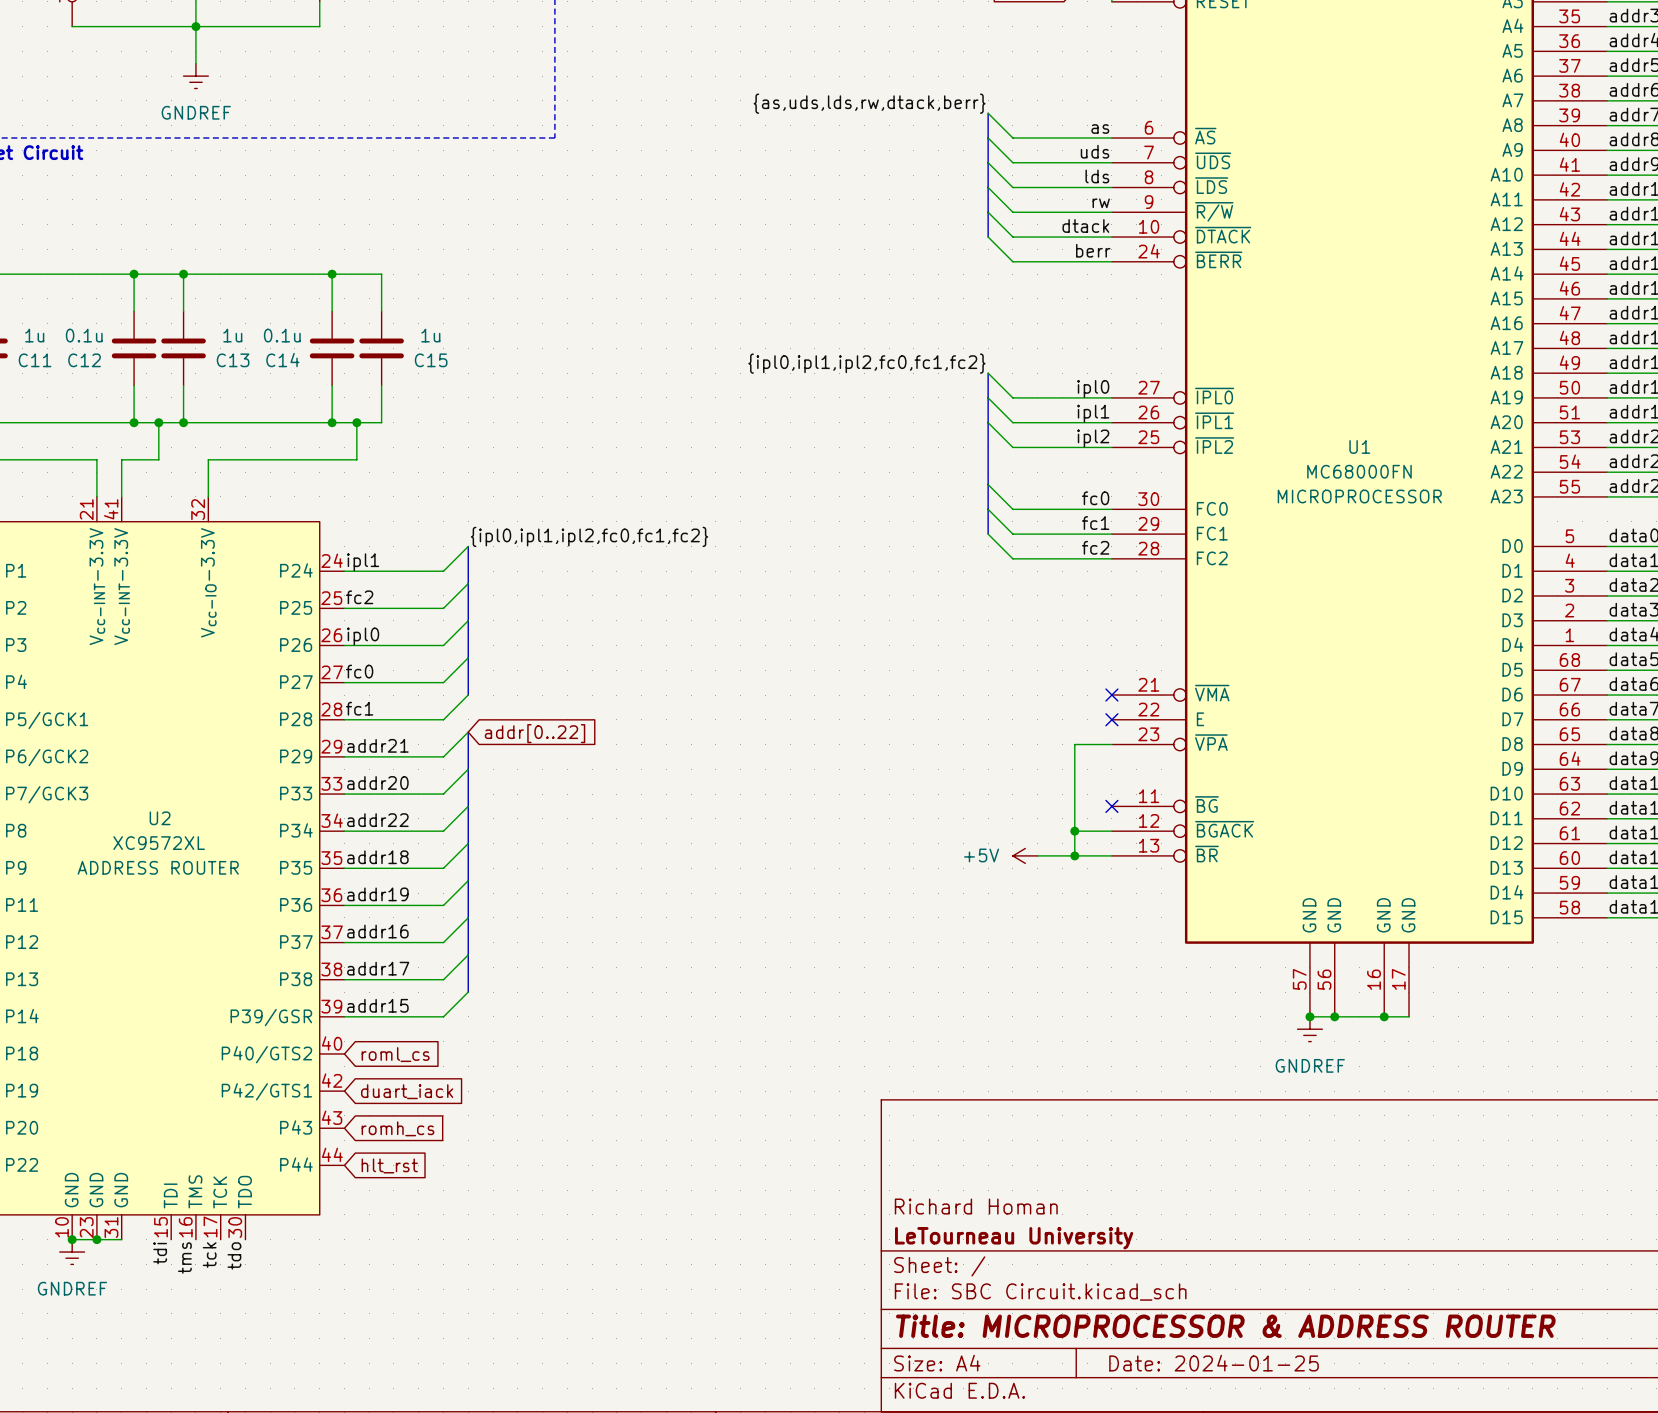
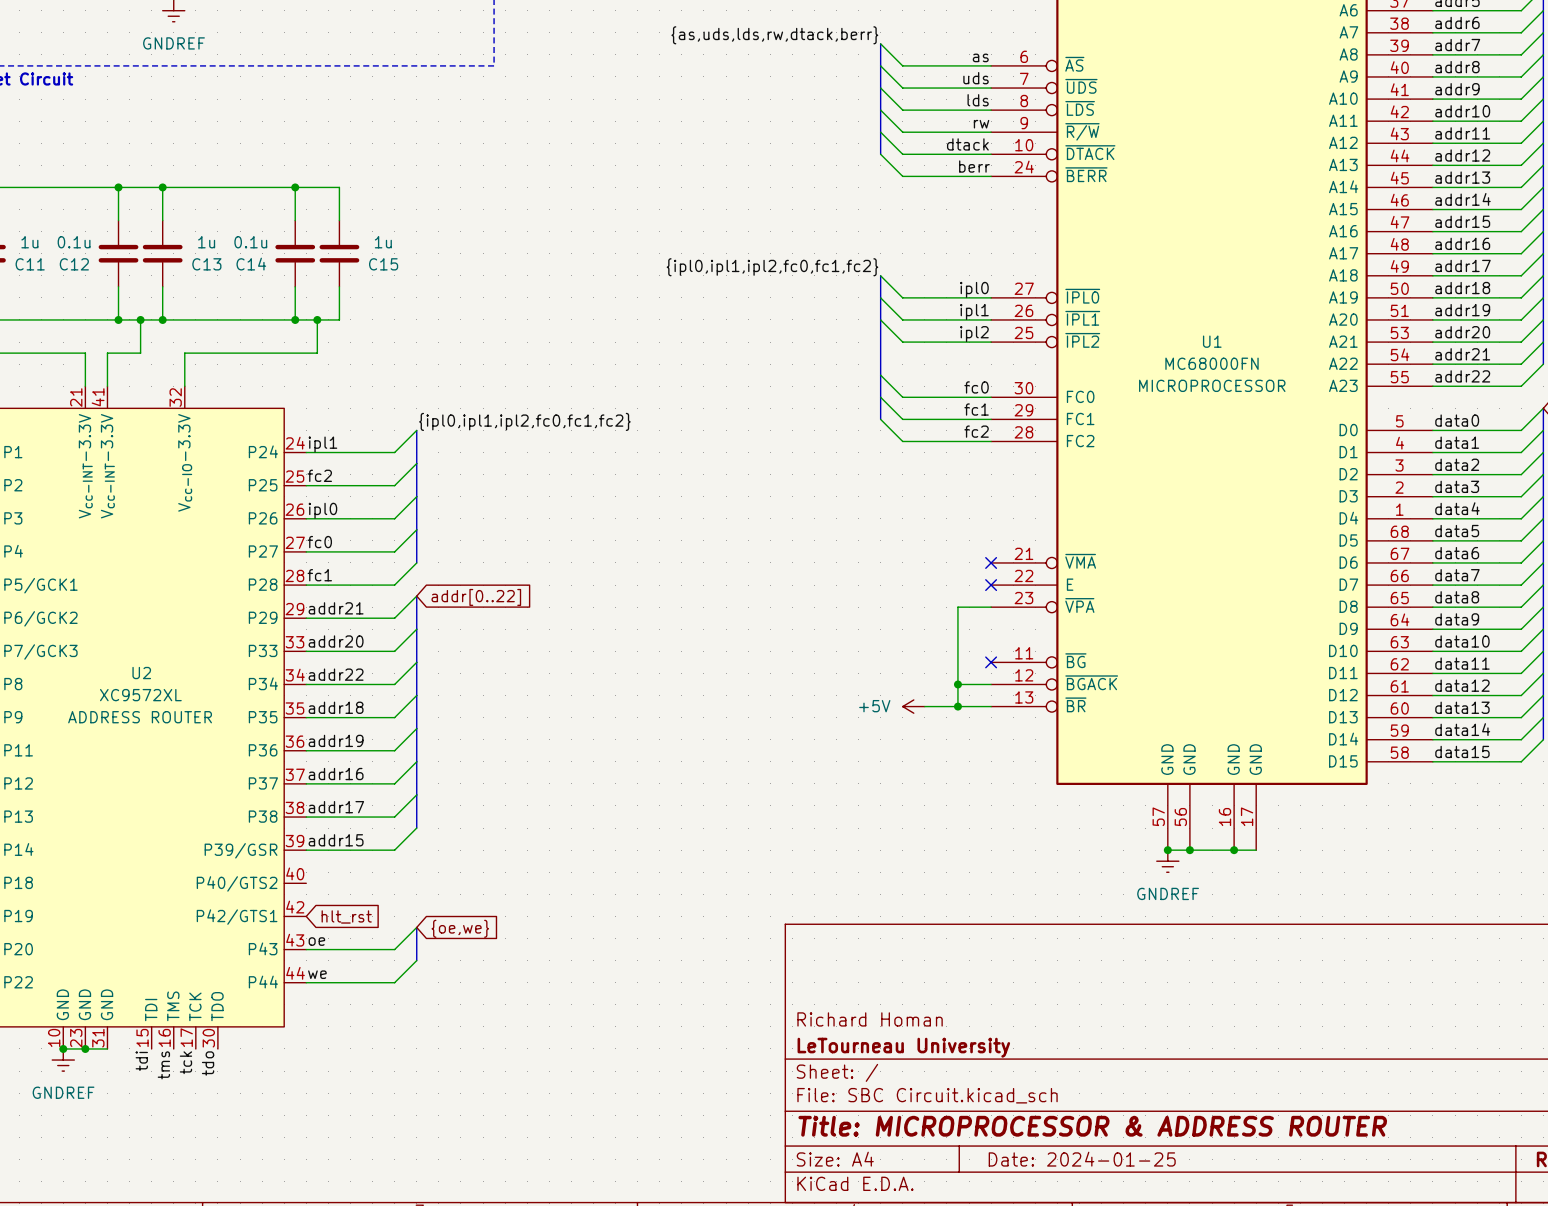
global label: roml_cs (395, 1054) -> none
global label: duart_iack (407, 1091) -> hlt_rst (346, 916)
wire: none -> (416, 927) (394, 949) (306, 949)
bus: none -> (416, 927) (416, 960)
global label: none -> {oe,we} (460, 928)
label: none -> oe (316, 941)
global label: romh_cs (397, 1128) -> none
wire: none -> (416, 960) (394, 982) (306, 982)
label: none -> we (317, 974)
global label: hlt_rst (389, 1165) -> none

